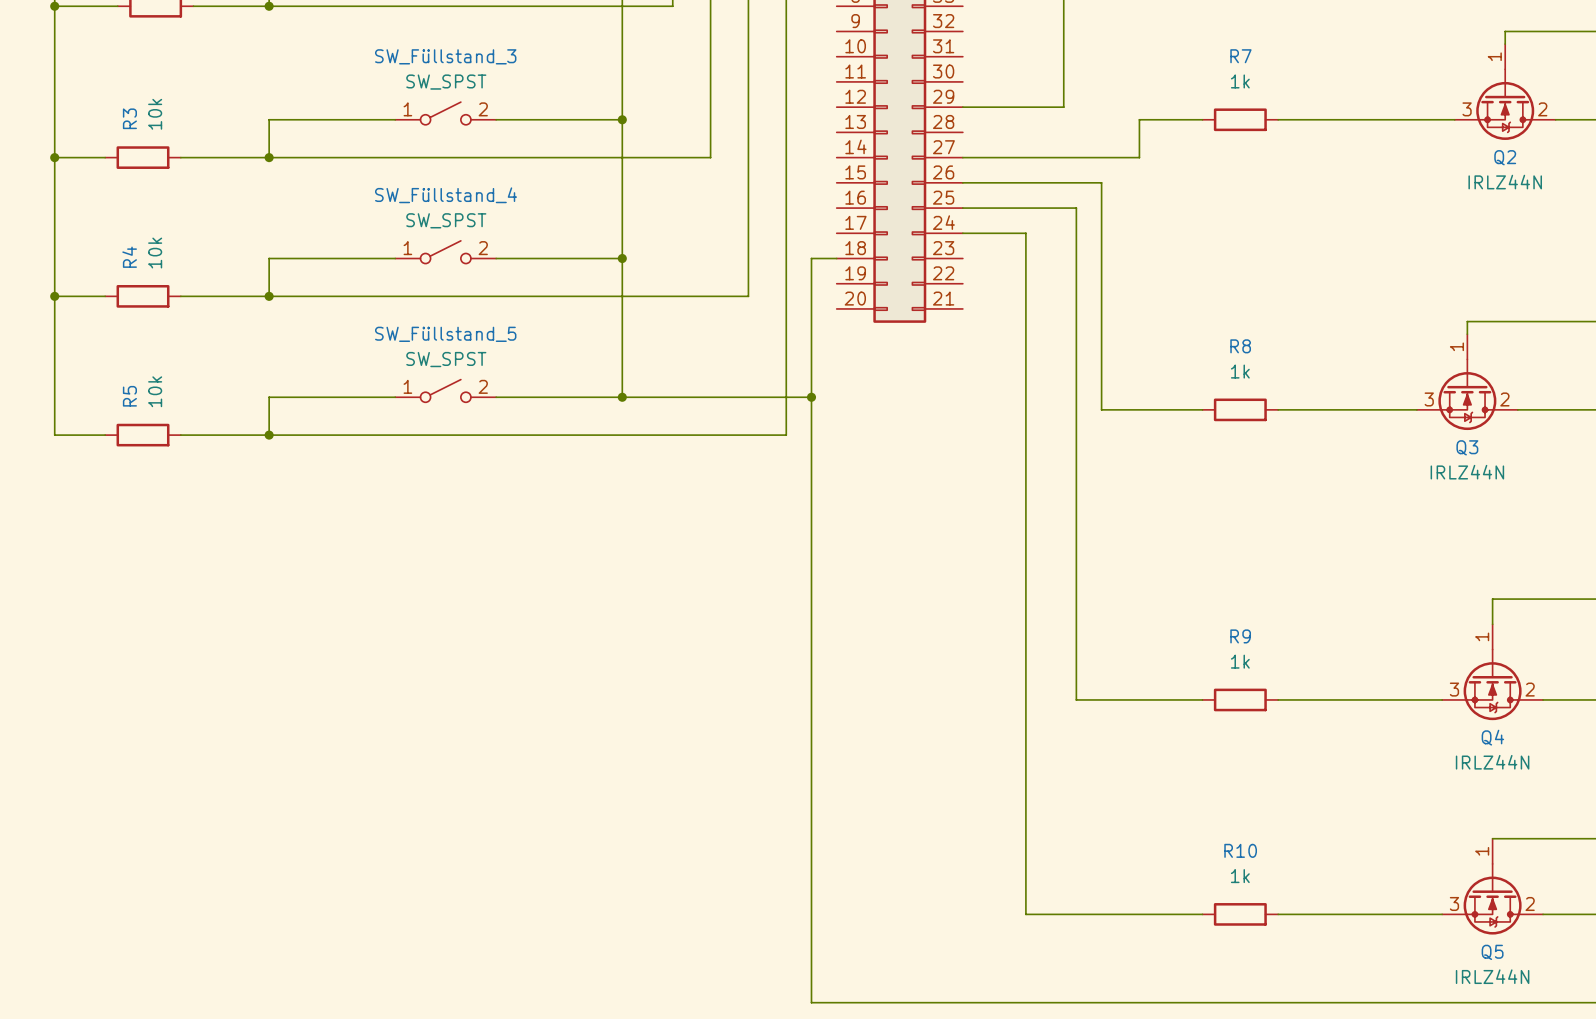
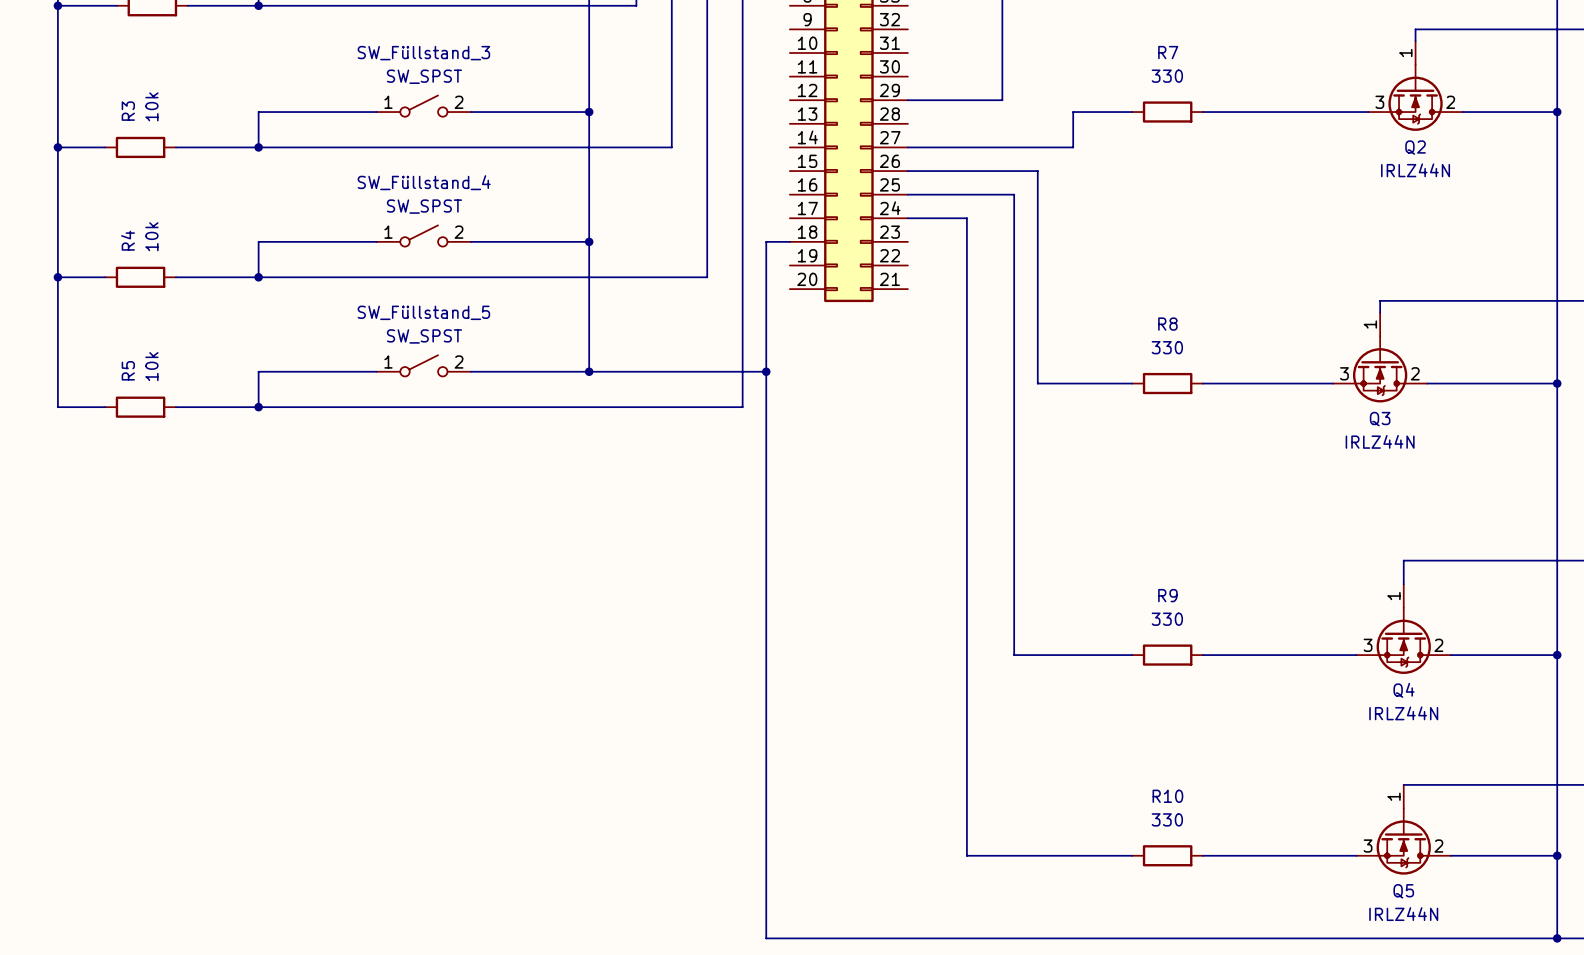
R7 value: 1k (1240, 81) -> 330 (1167, 76)
R8 value: 1k (1240, 371) -> 330 (1167, 347)
R9 value: 1k (1240, 661) -> 330 (1167, 619)
R10 value: 1k (1240, 876) -> 330 (1167, 819)

